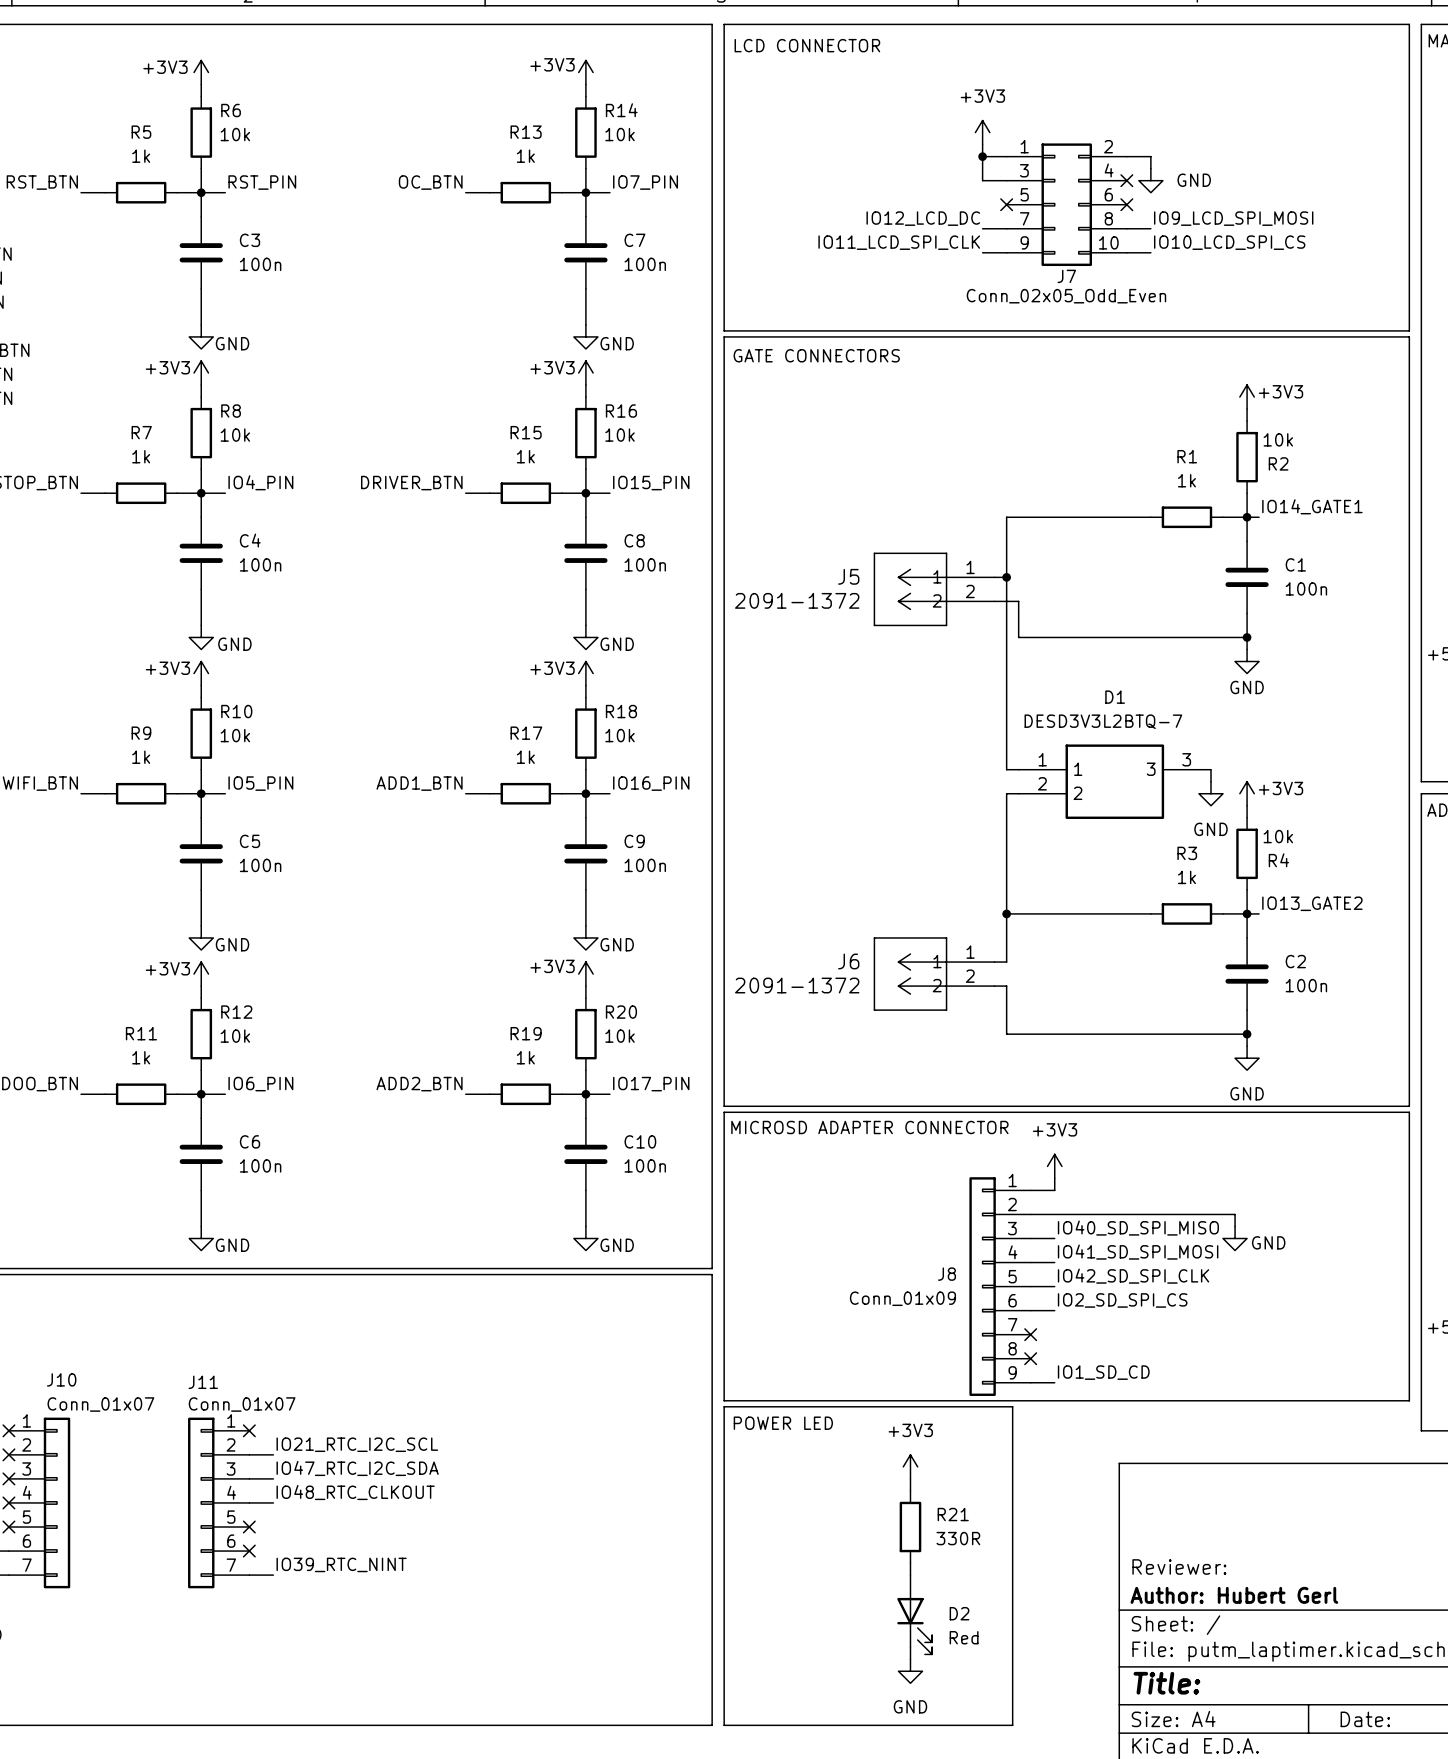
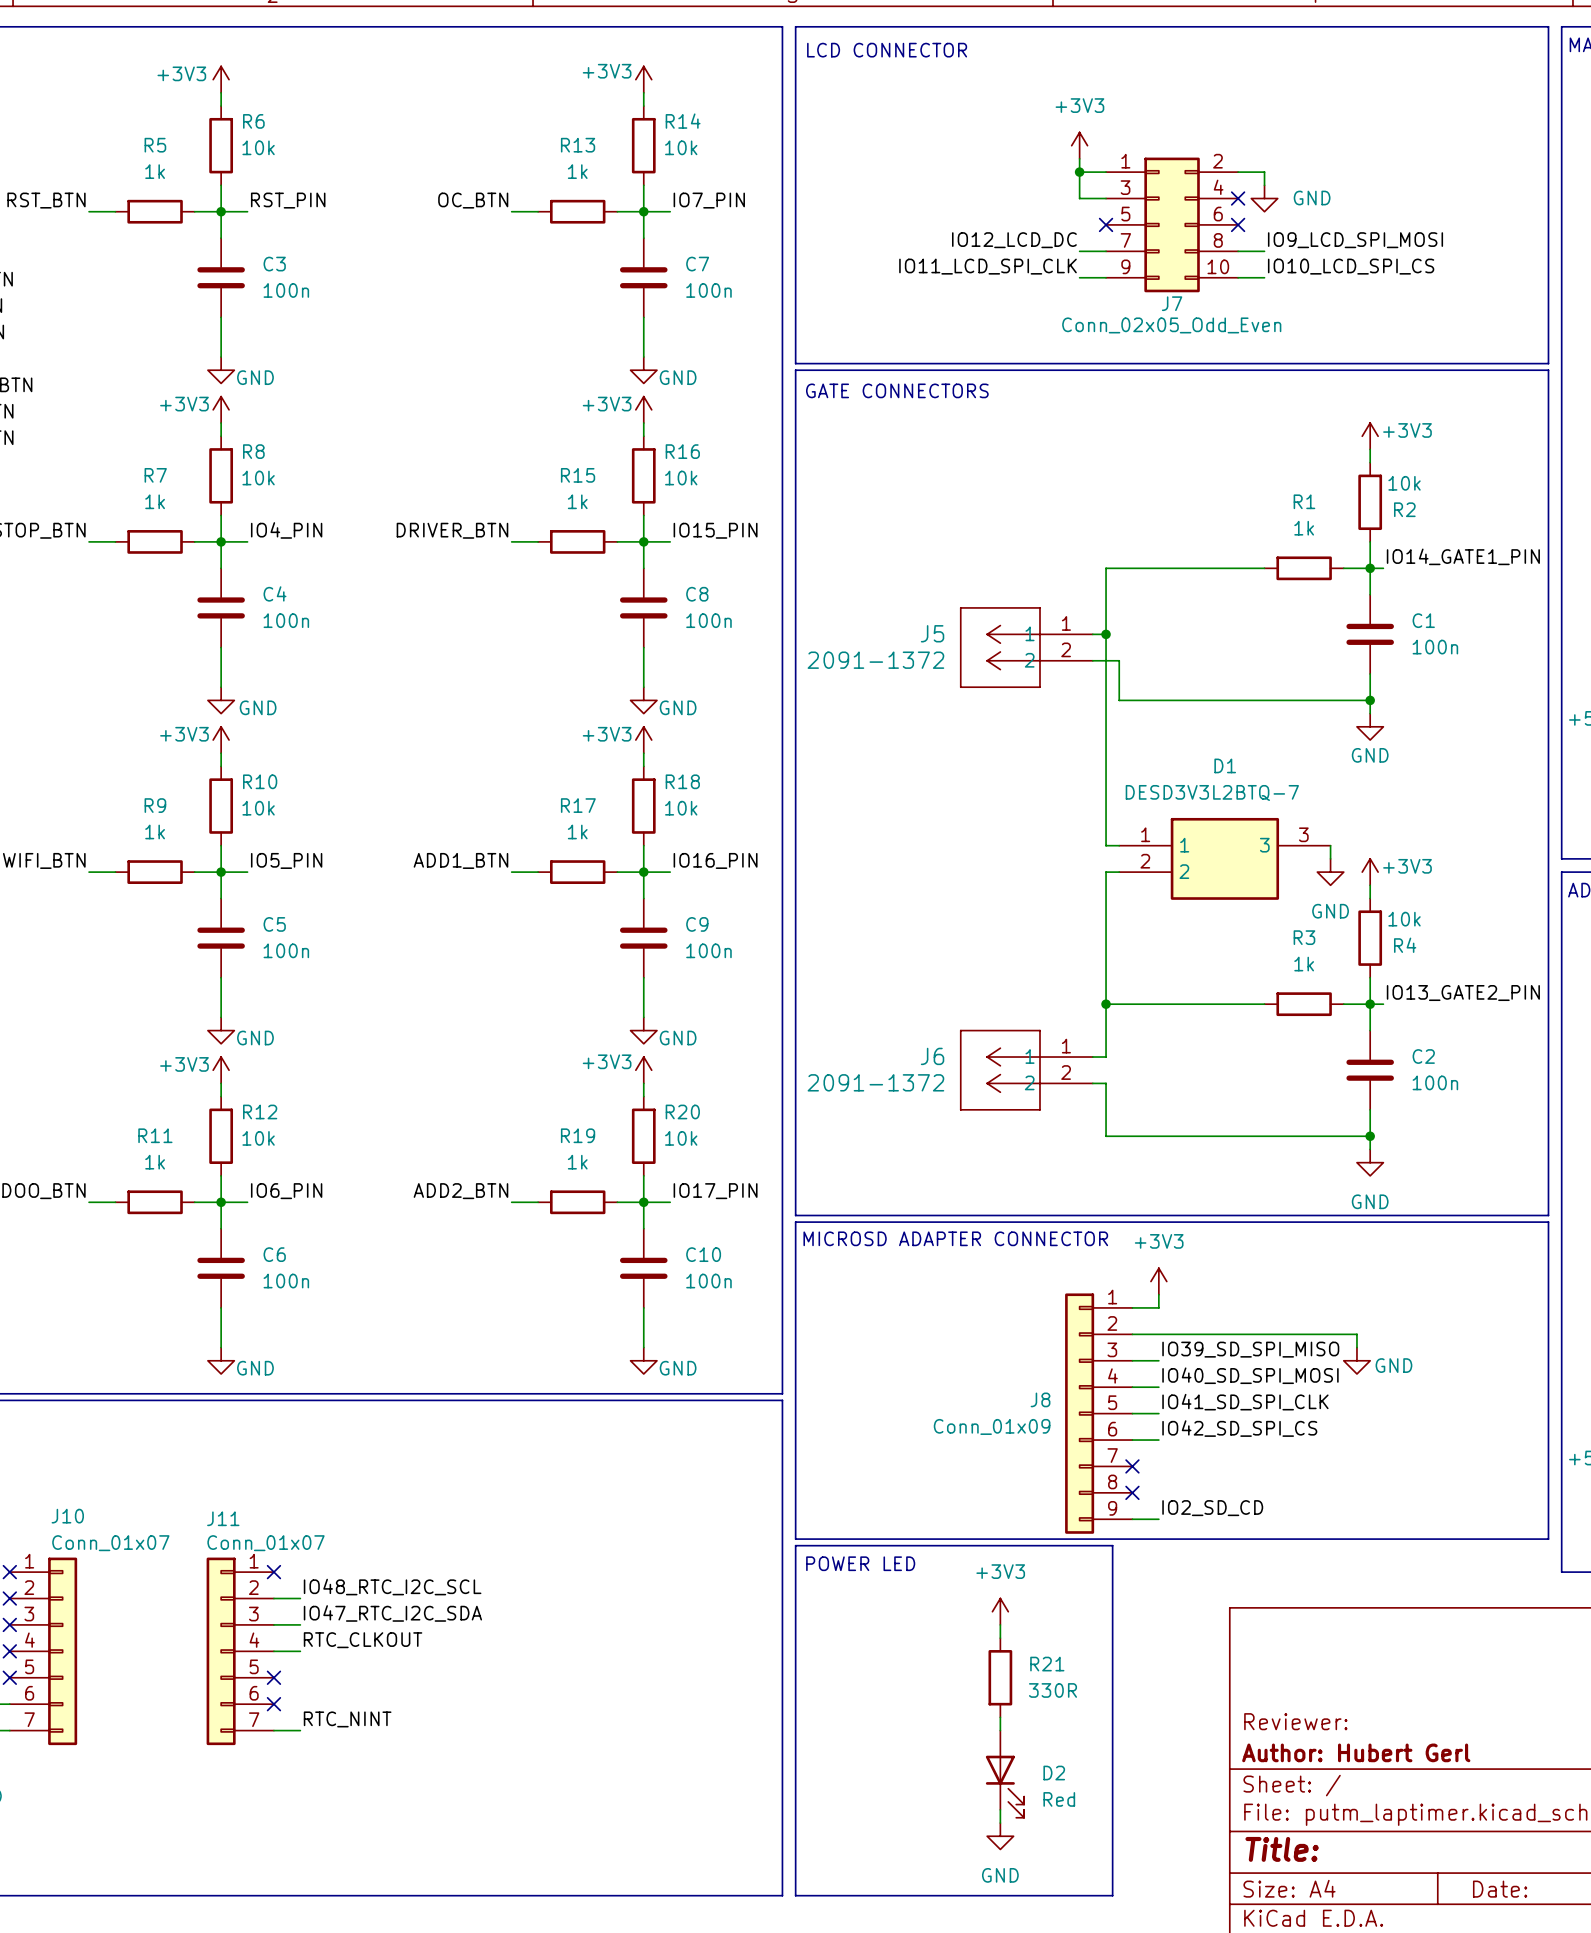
label: IO14_GATE1 (1312, 506) -> IO14_GATE1_PIN (1463, 556)
label: IO13_GATE2 (1312, 903) -> IO13_GATE2_PIN (1463, 993)
label: IO40_SD_SPI_MISO (1138, 1228) -> IO39_SD_SPI_MISO (1250, 1349)
label: IO41_SD_SPI_MOSI (1138, 1252) -> IO40_SD_SPI_MOSI (1250, 1375)
label: IO42_SD_SPI_CLK (1133, 1276) -> IO41_SD_SPI_CLK (1245, 1402)
label: IO2_SD_SPI_CS (1122, 1300) -> IO42_SD_SPI_CS (1239, 1428)
label: IO1_SD_CD (1103, 1372) -> IO2_SD_CD (1212, 1508)
label: IO21_RTC_I2C_SCL (357, 1444) -> IO48_RTC_I2C_SCL (392, 1587)
label: IO48_RTC_CLKOUT (355, 1492) -> RTC_CLKOUT (363, 1640)
label: IO39_RTC_NINT (341, 1564) -> RTC_NINT (347, 1719)

